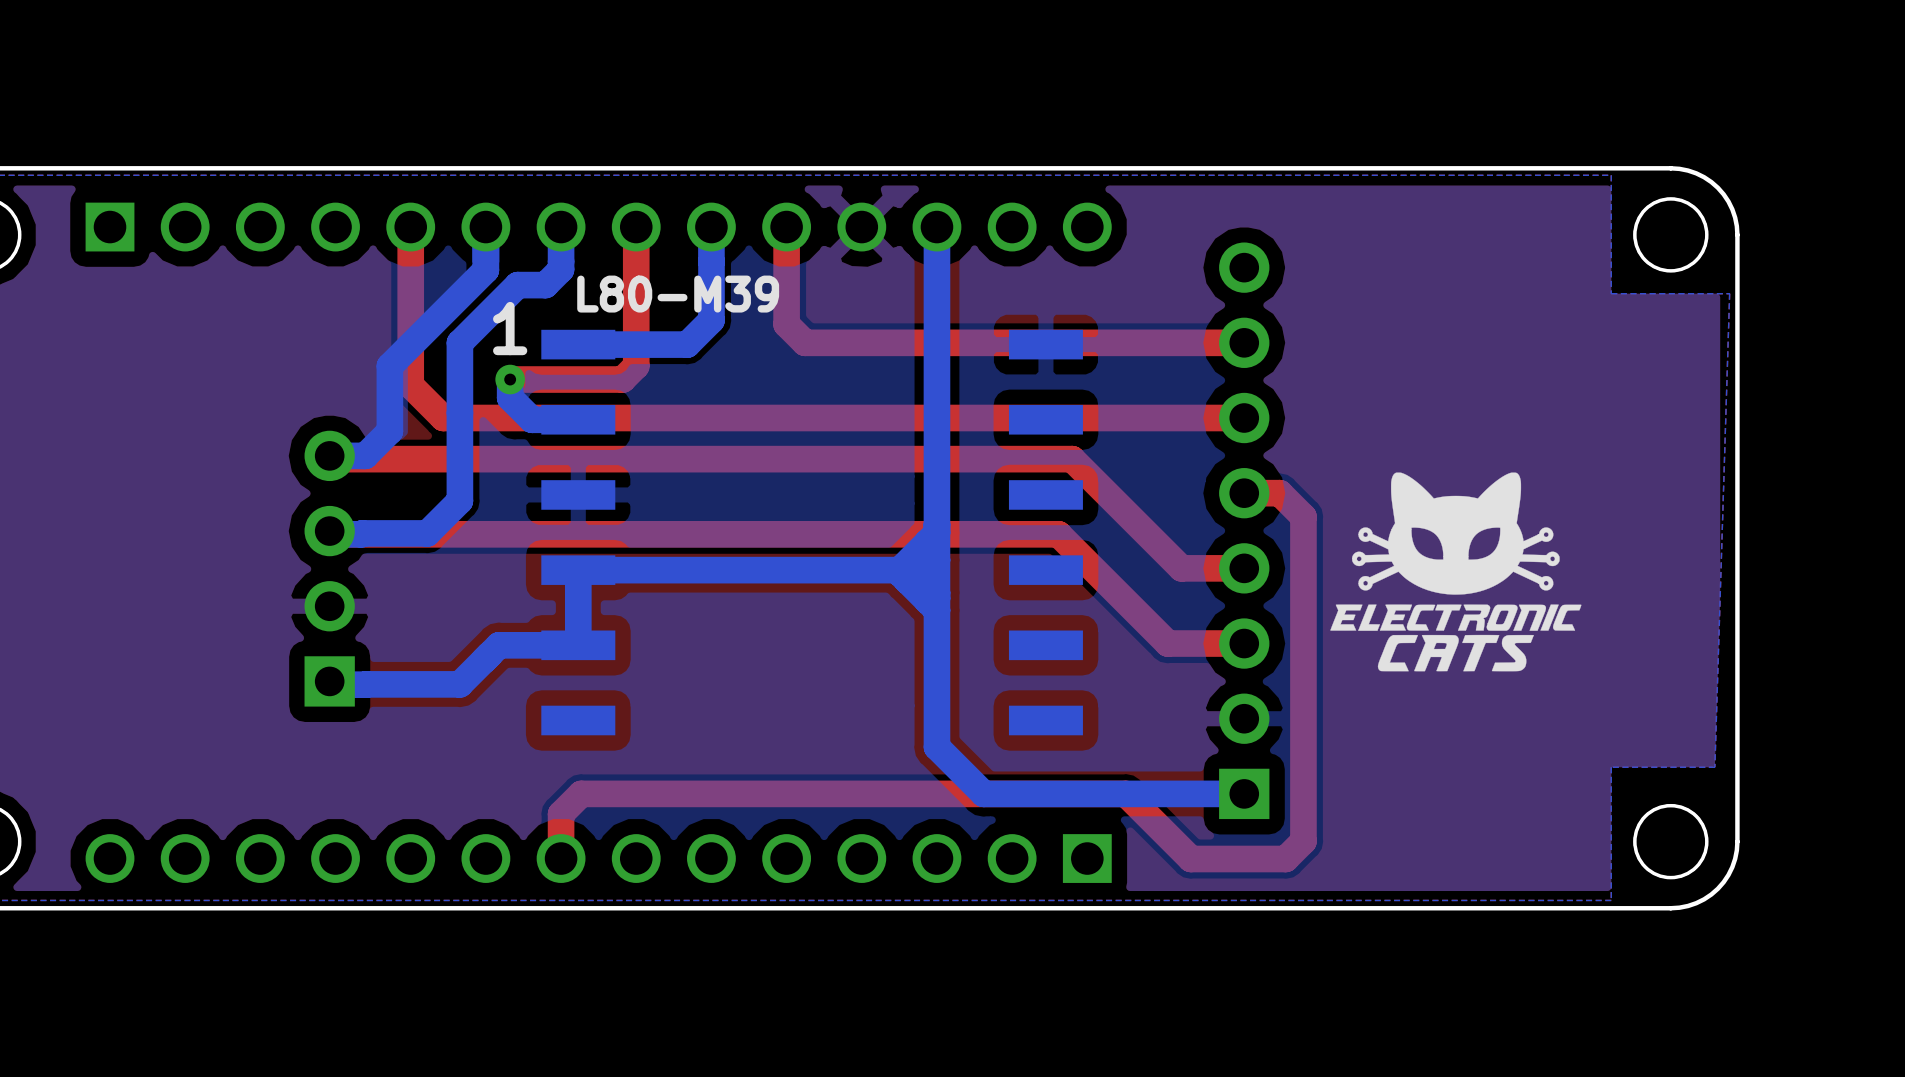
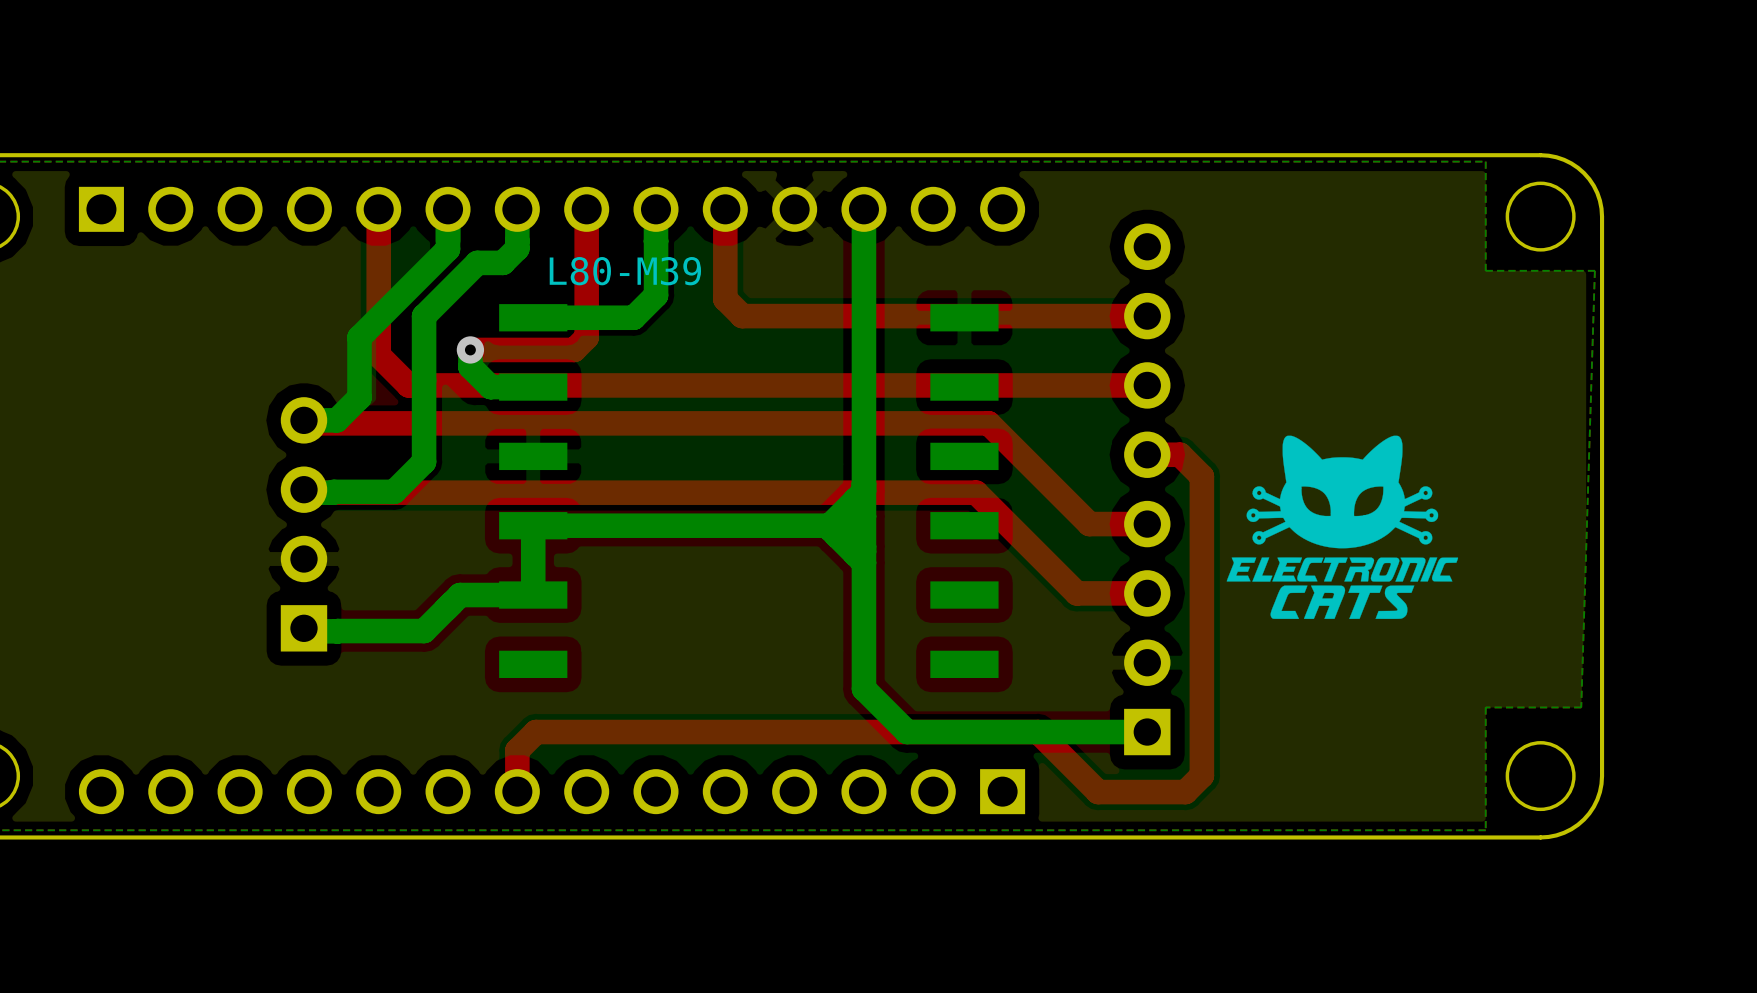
text: 1 (510, 328) -> none

